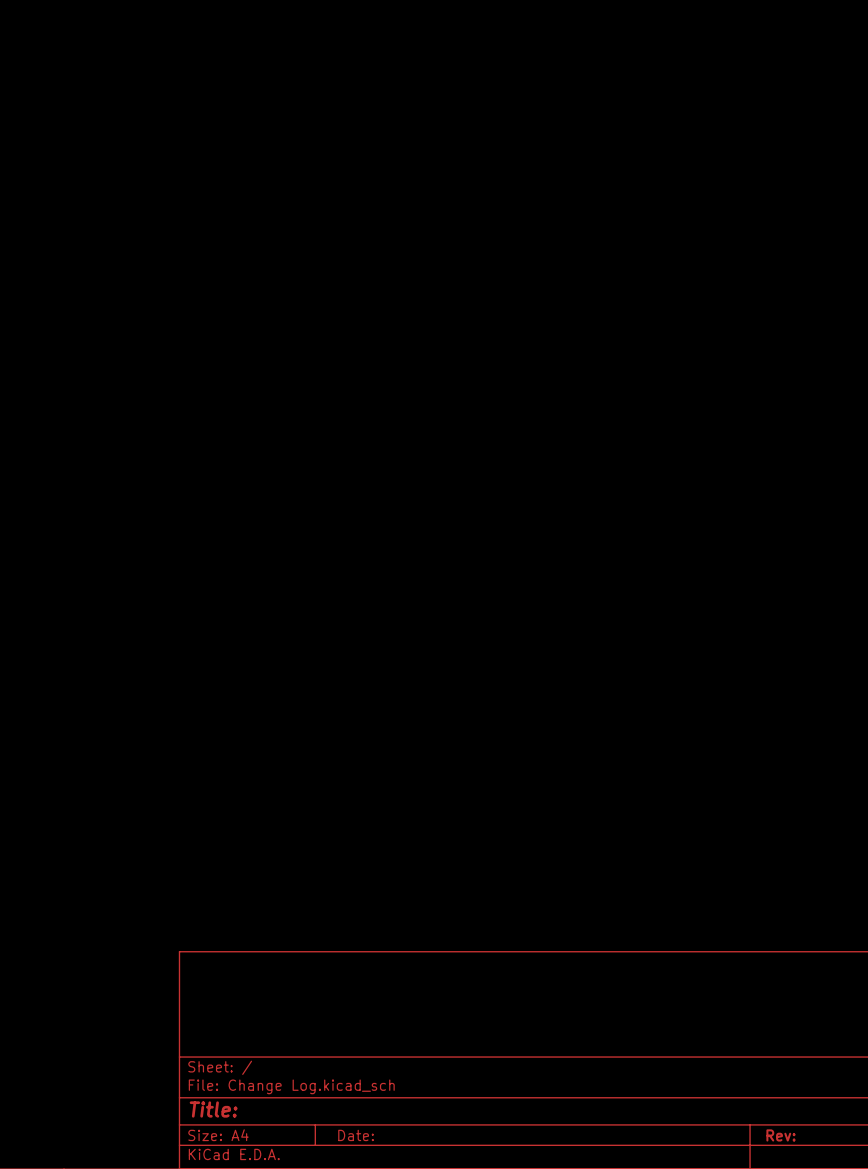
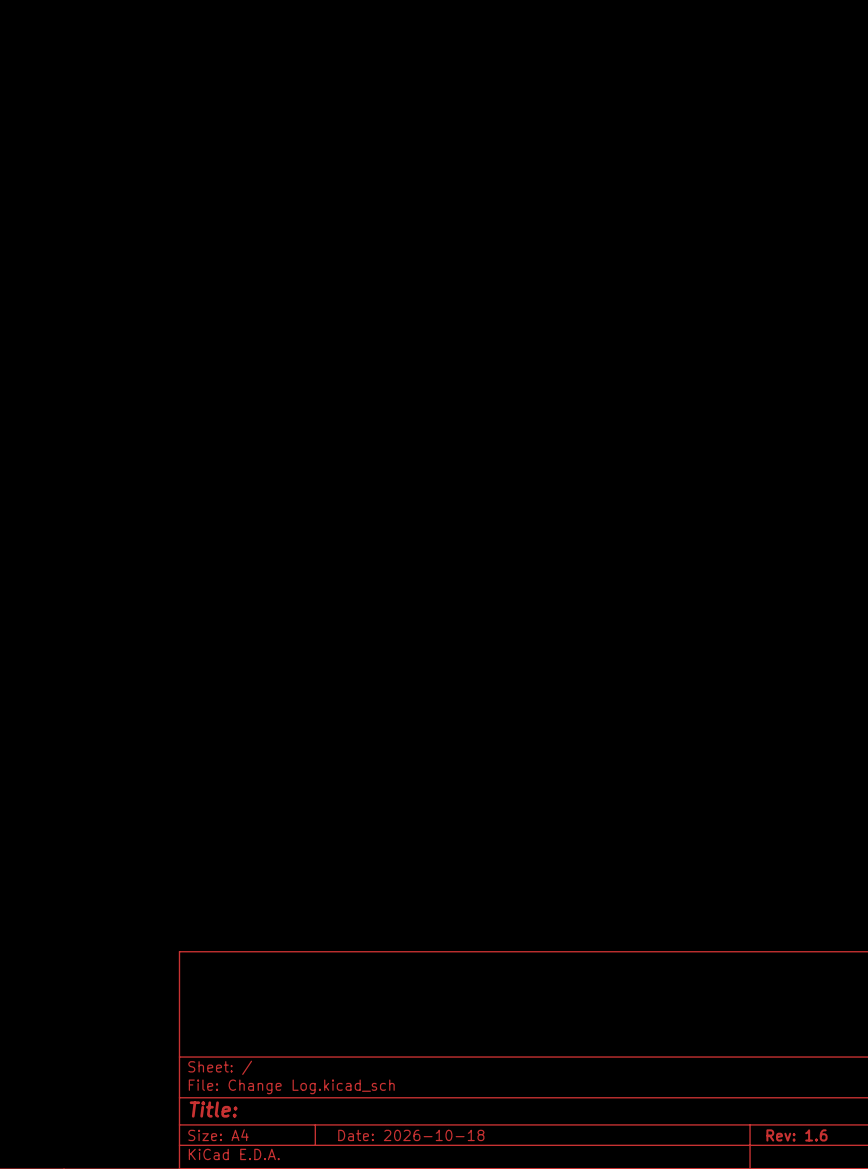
title block: Date: (356, 1135) -> Date: 2026-10-18 (411, 1135)
title block: Rev: (780, 1135) -> Rev: 1.6 (796, 1135)

